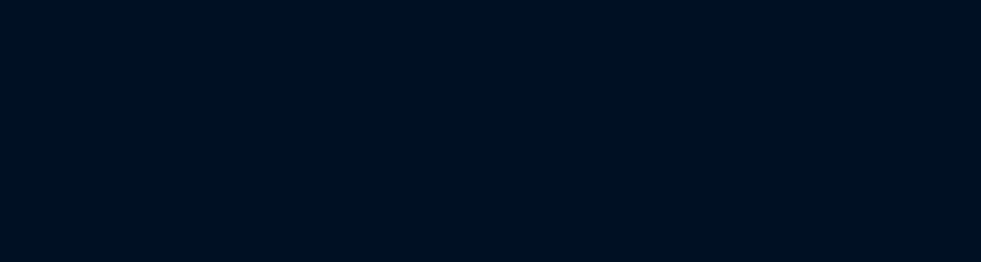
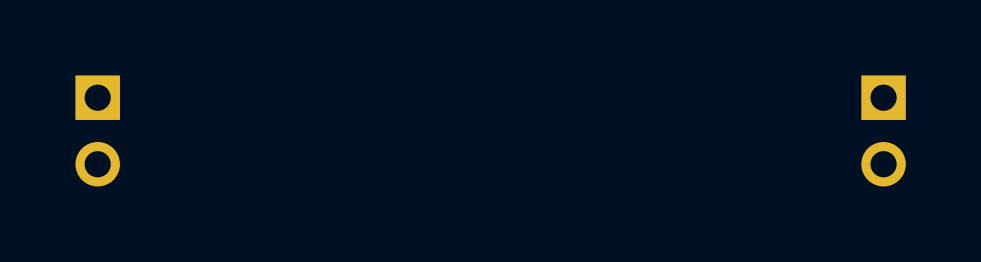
part: none -> (97, 130)
part: none -> (883, 130)

